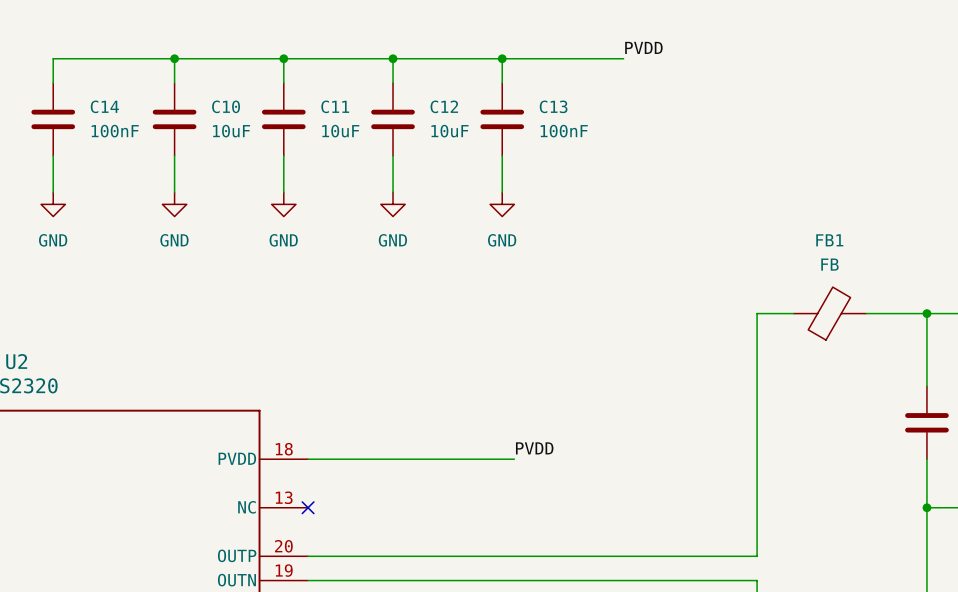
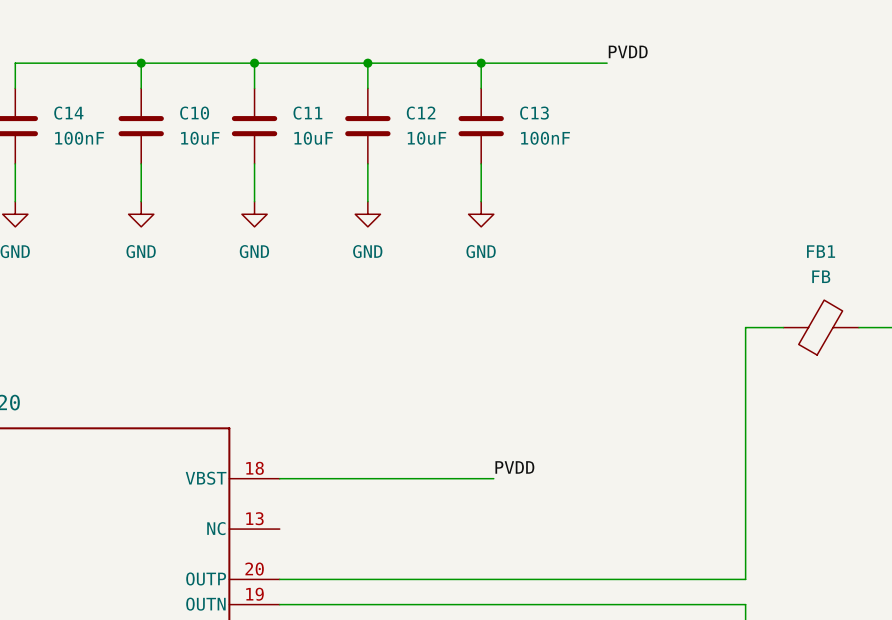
U2 pin name: PVDD (237, 458) -> VBST (206, 478)
no-connect mark: (308, 507) -> none

